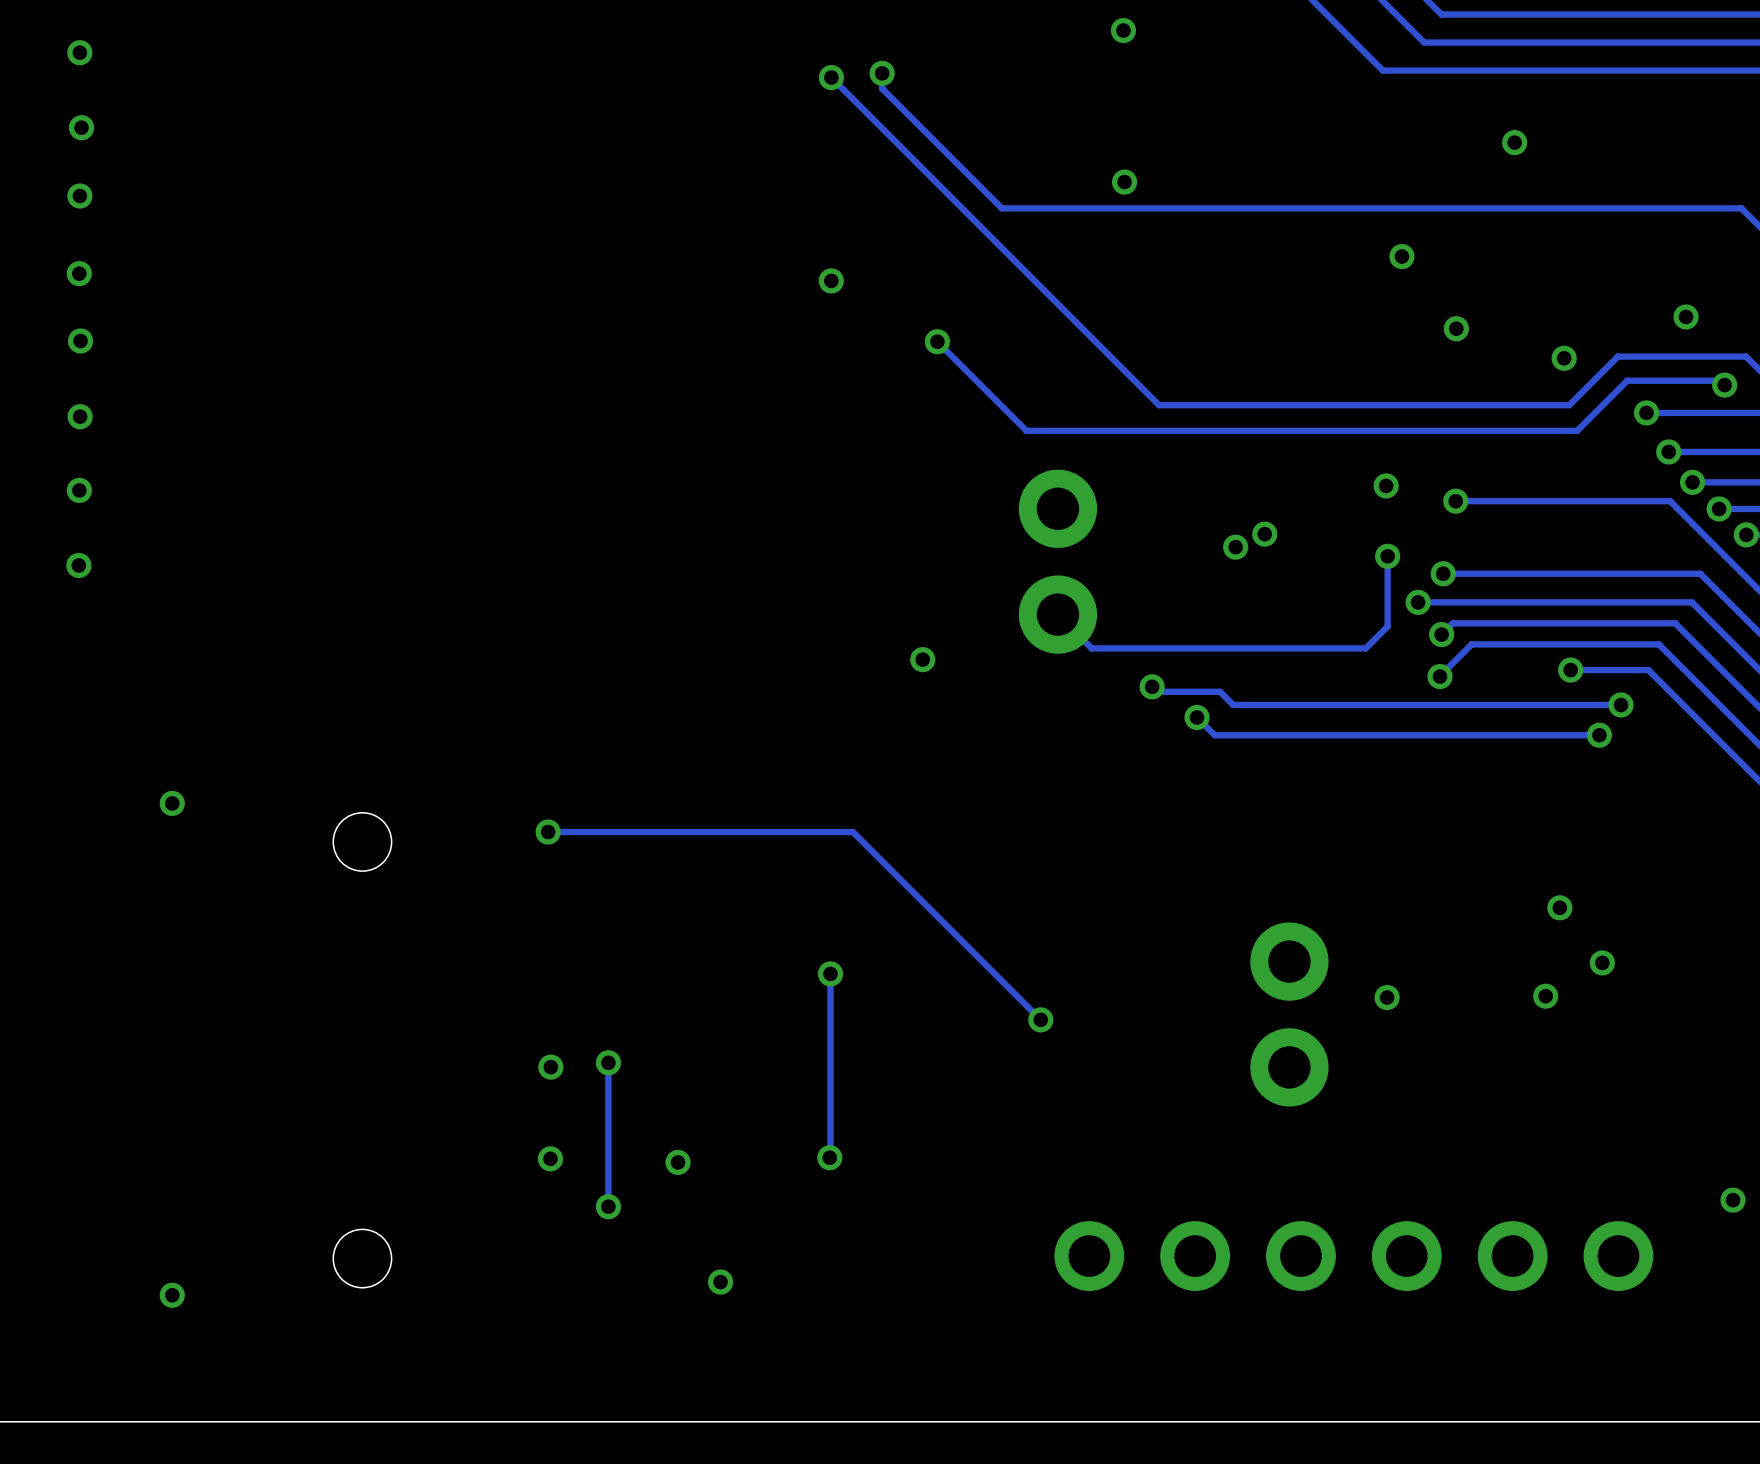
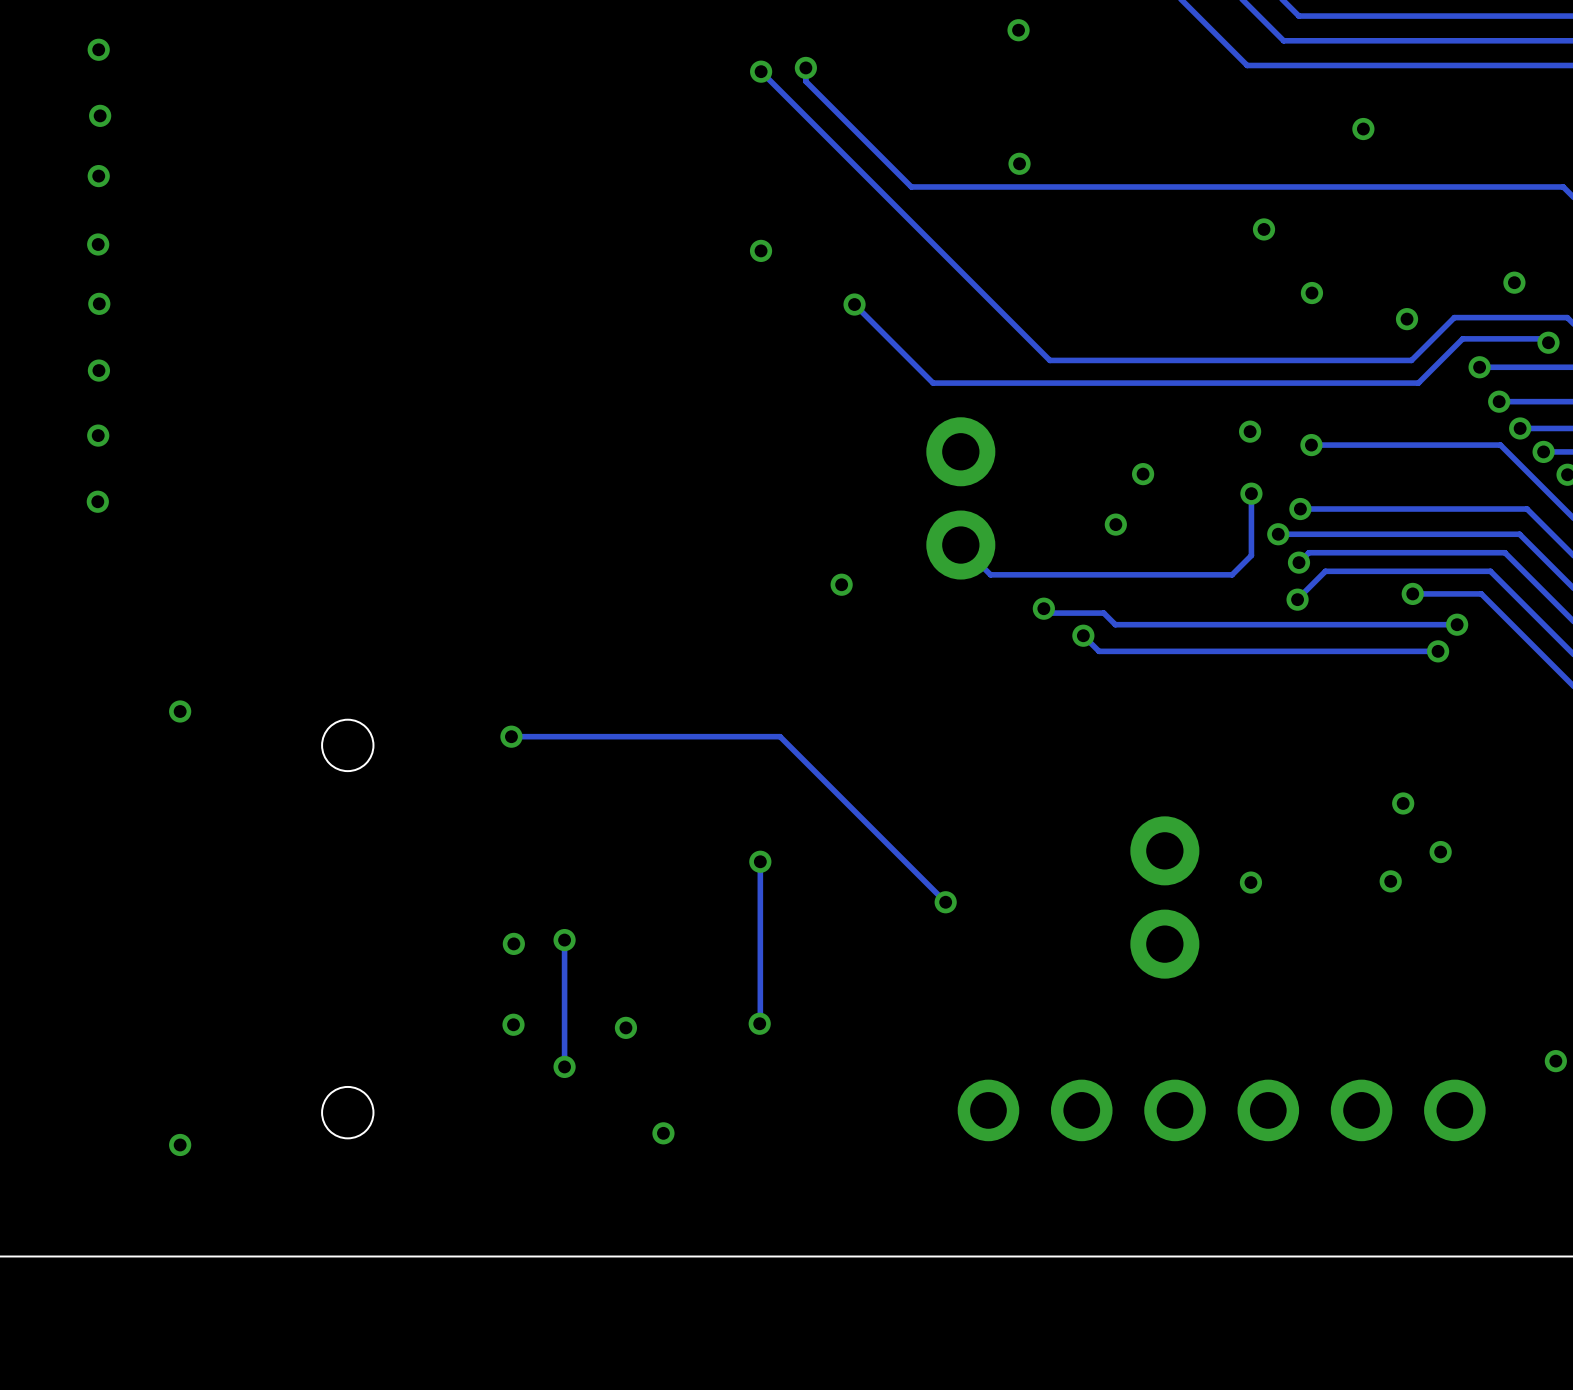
via position: (1235, 547) -> (1115, 524)

